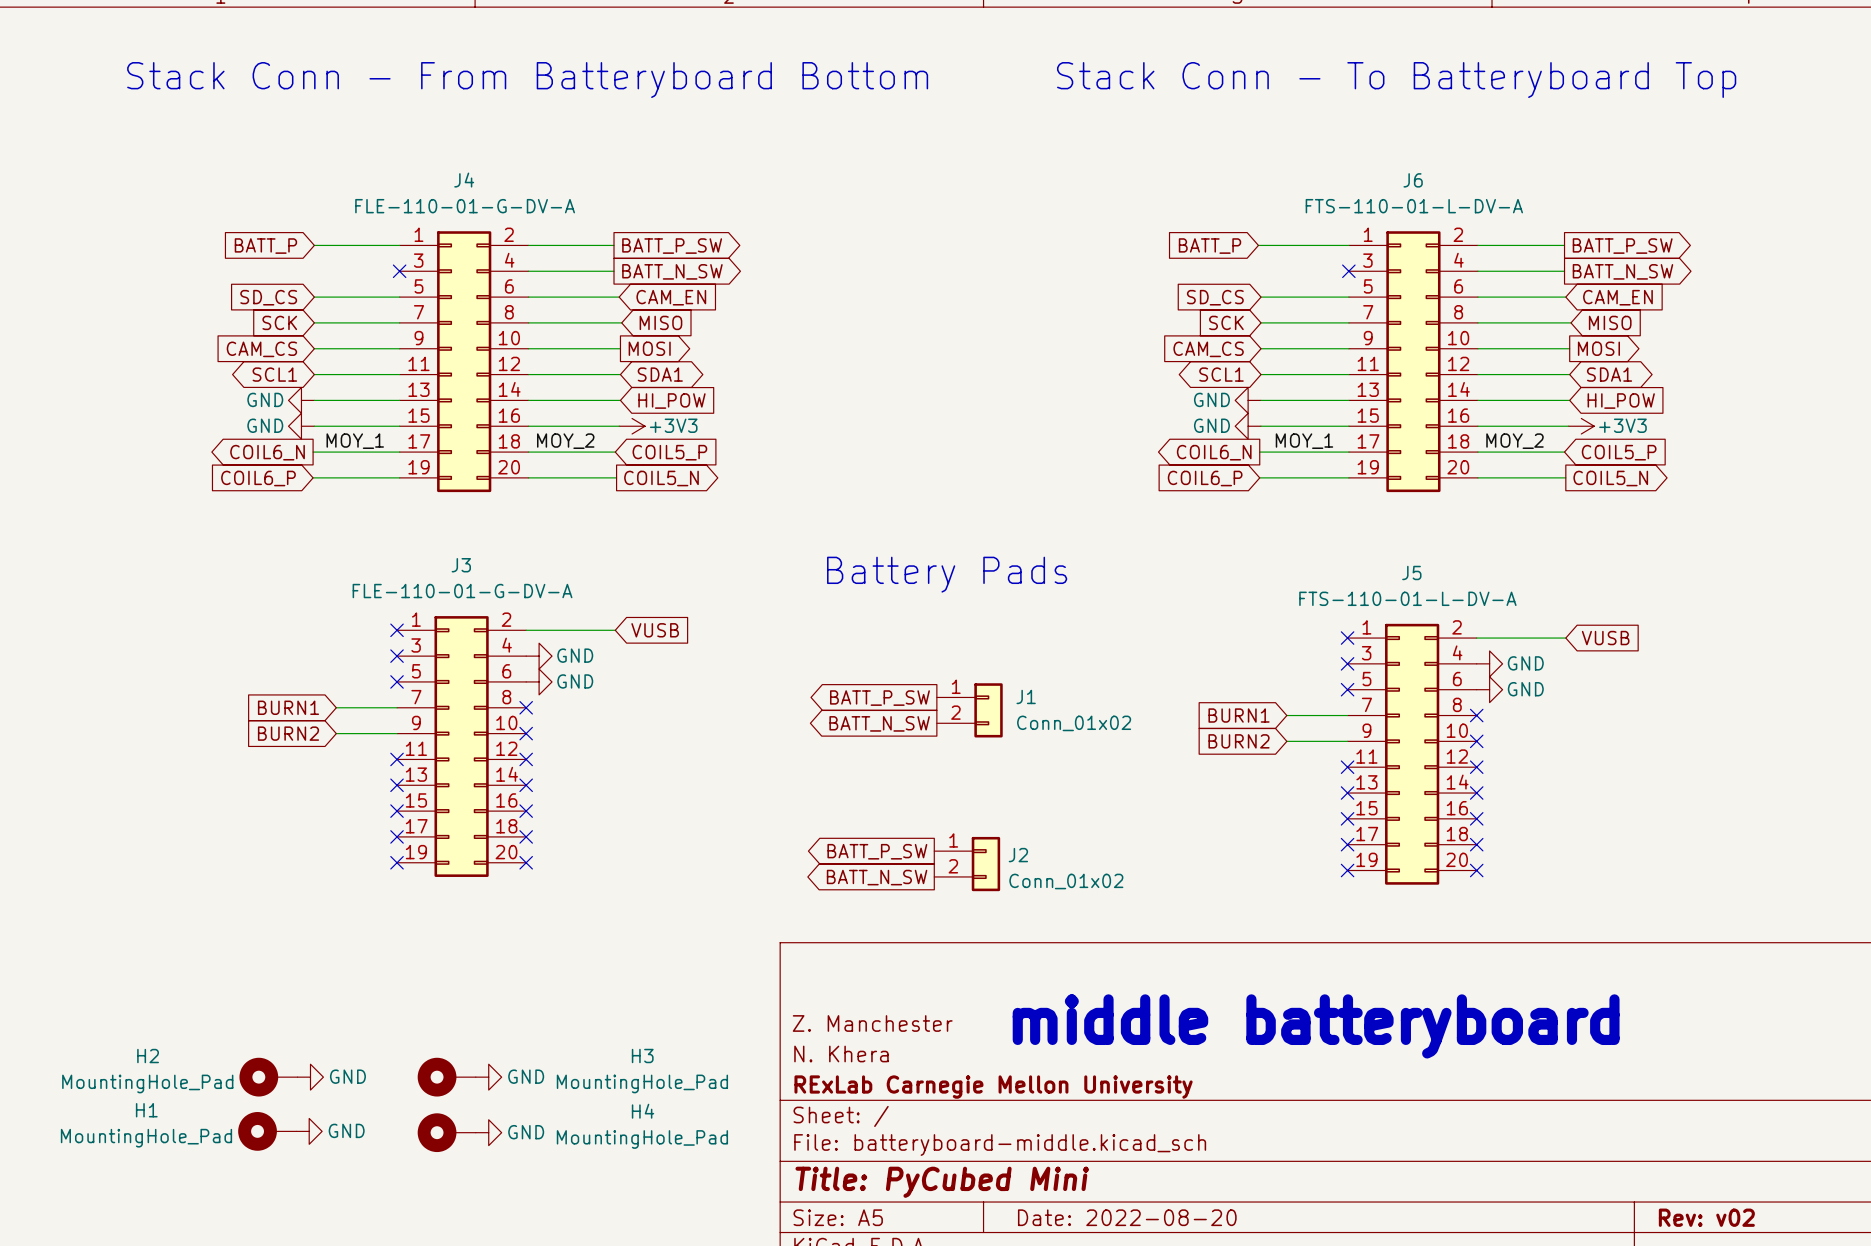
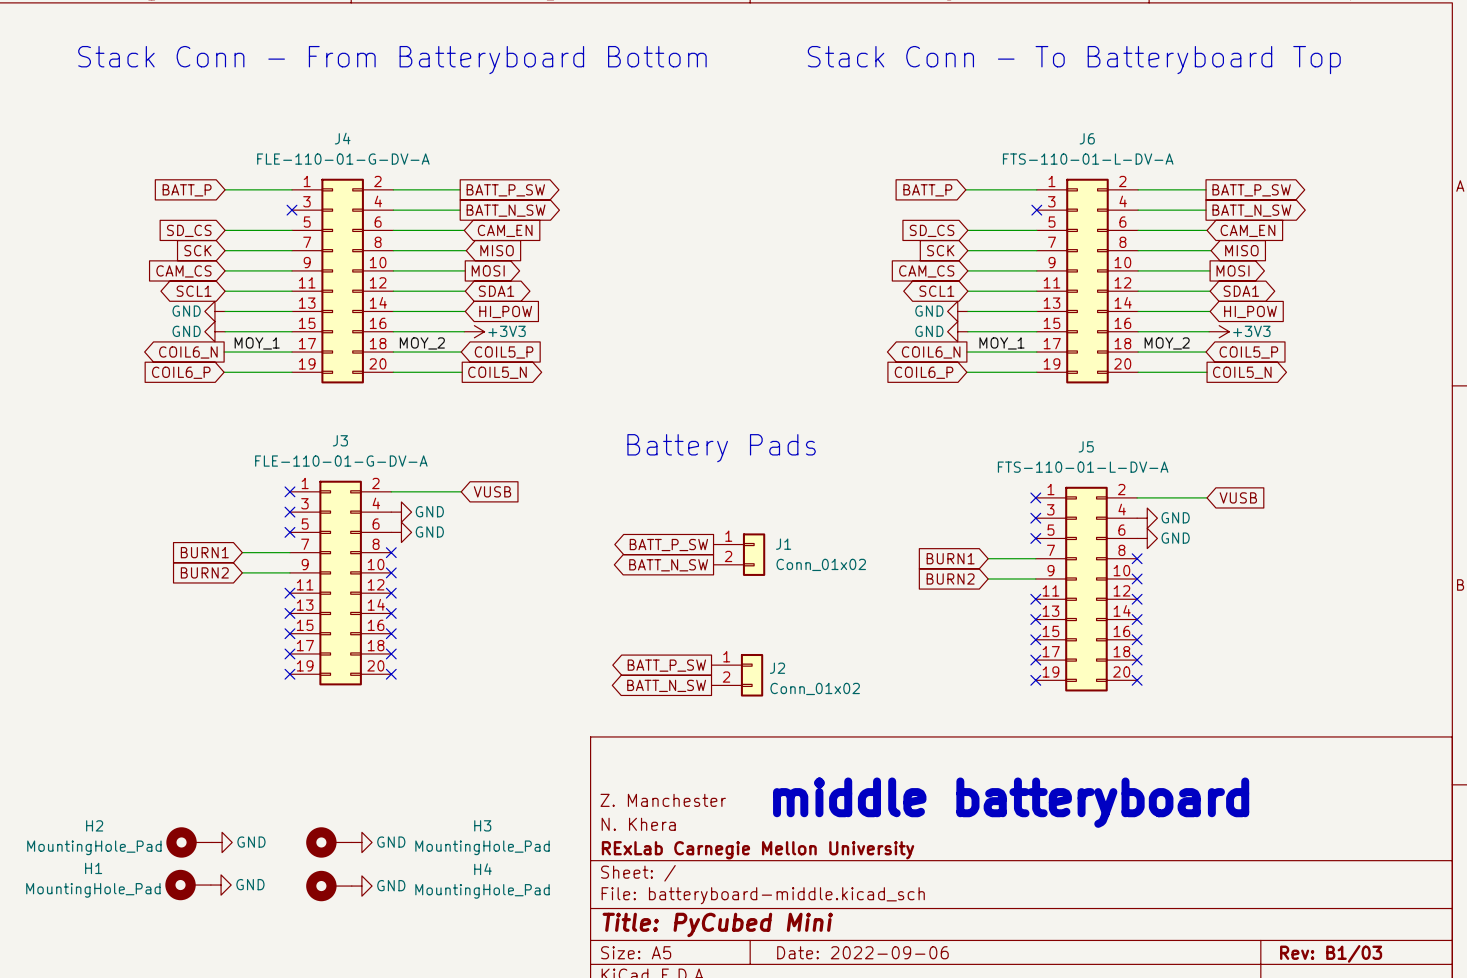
title block: Date: 2022-08-20 (1127, 1217) -> Date: 2022-09-06 (862, 952)
title block: Rev: v02 (1706, 1217) -> Rev: B1/03 (1331, 953)

